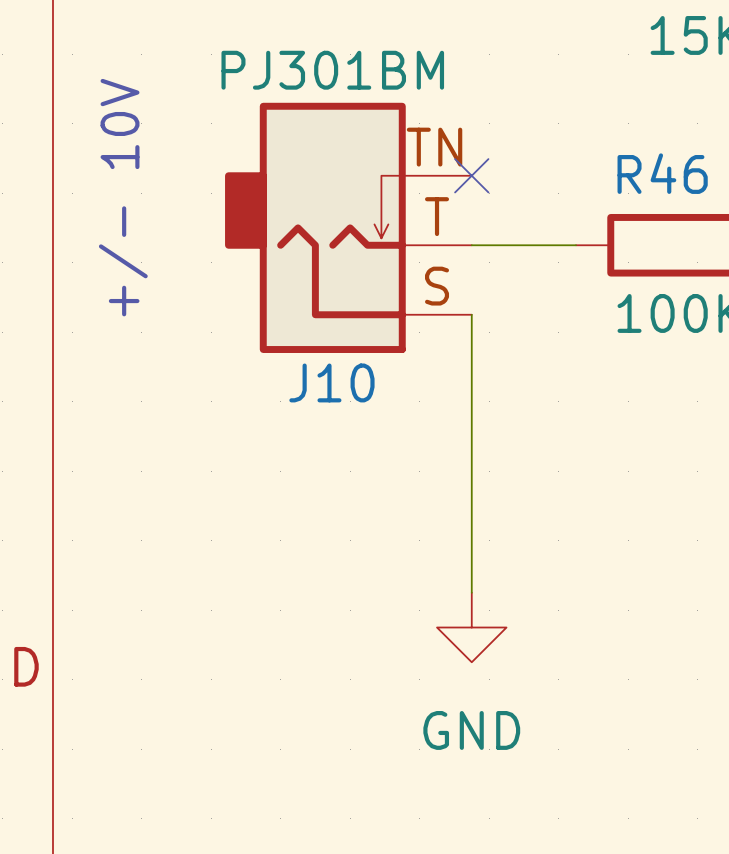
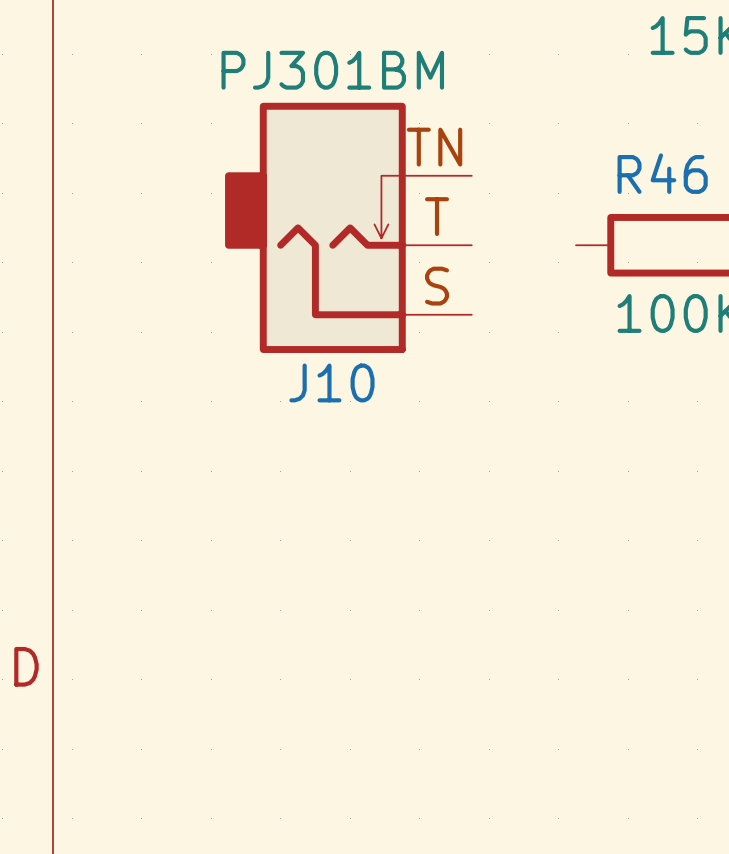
no-connect mark: (471, 175) -> none
text: +/- 10V (123, 197) -> none
wire: (471, 245) (576, 245) -> none
wire: (471, 314) (471, 592) -> none
power symbol: GND (471, 627) -> none

